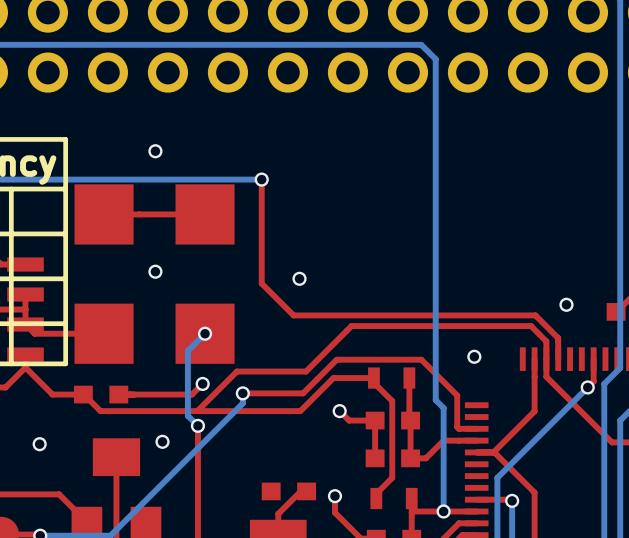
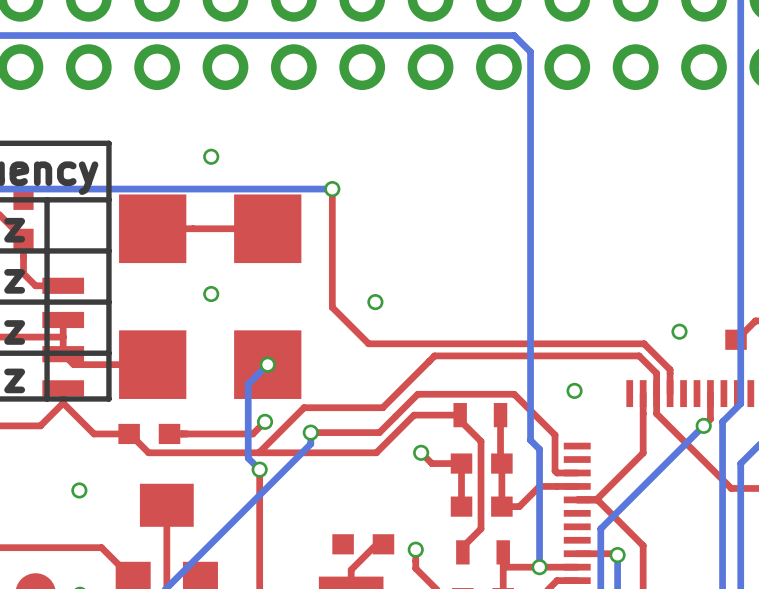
via: (162, 441) -> none

